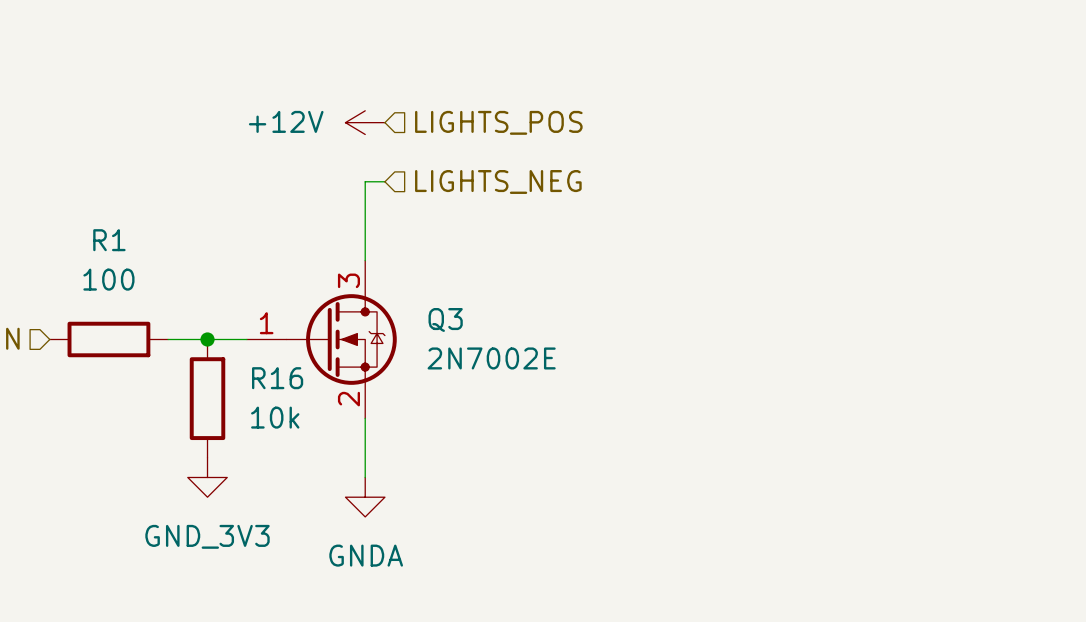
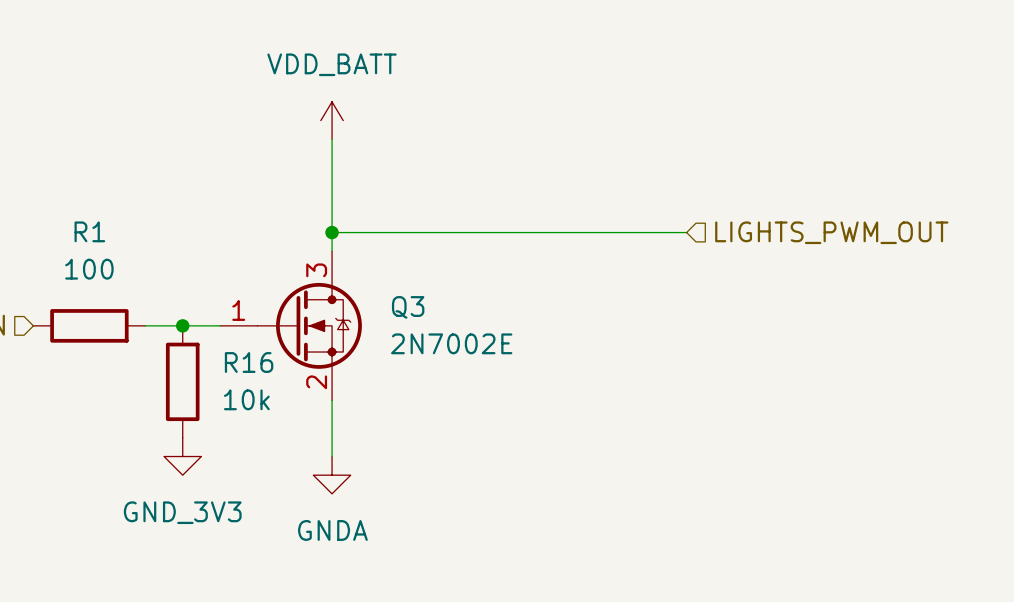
power symbol: +12V (365, 122) -> VDD_BATT (332, 120)
hierarchical label: LIGHTS_POS (498, 122) -> none
wire: (365, 181) (384, 181) -> (332, 176) (332, 139)
hierarchical label: LIGHTS_NEG (498, 181) -> none
wire: none -> (332, 232) (686, 232)
junction: none -> (332, 232)
hierarchical label: none -> LIGHTS_PWM_OUT (831, 232)

